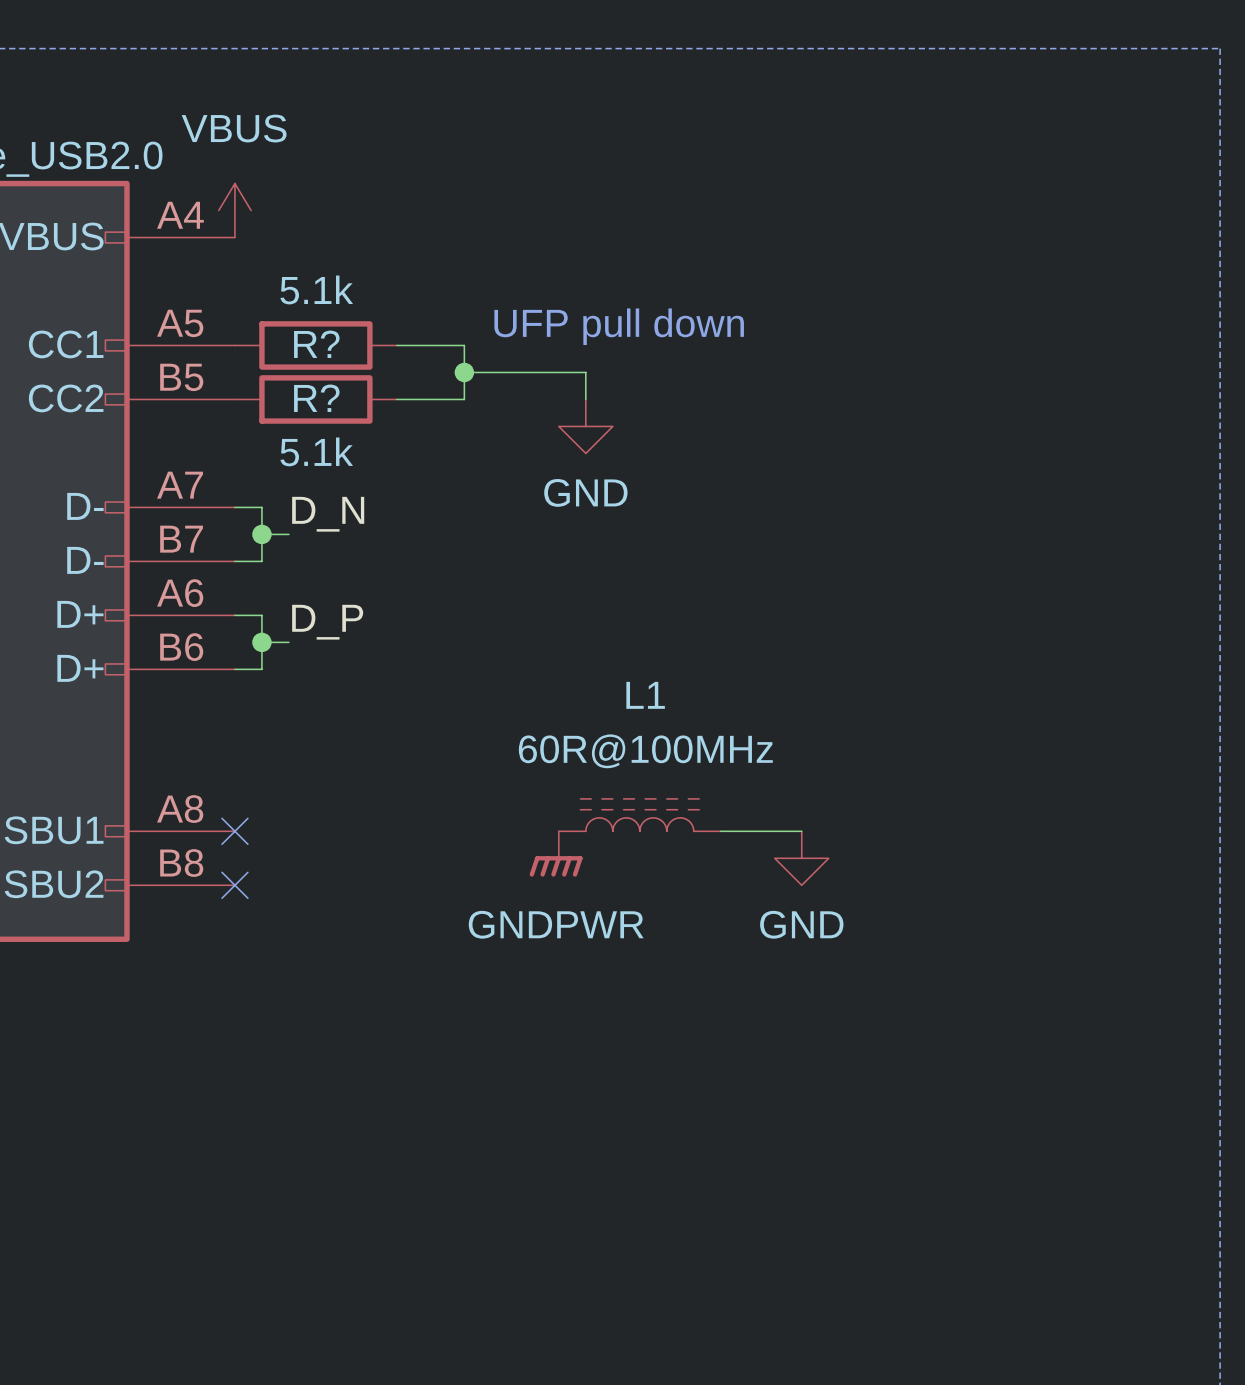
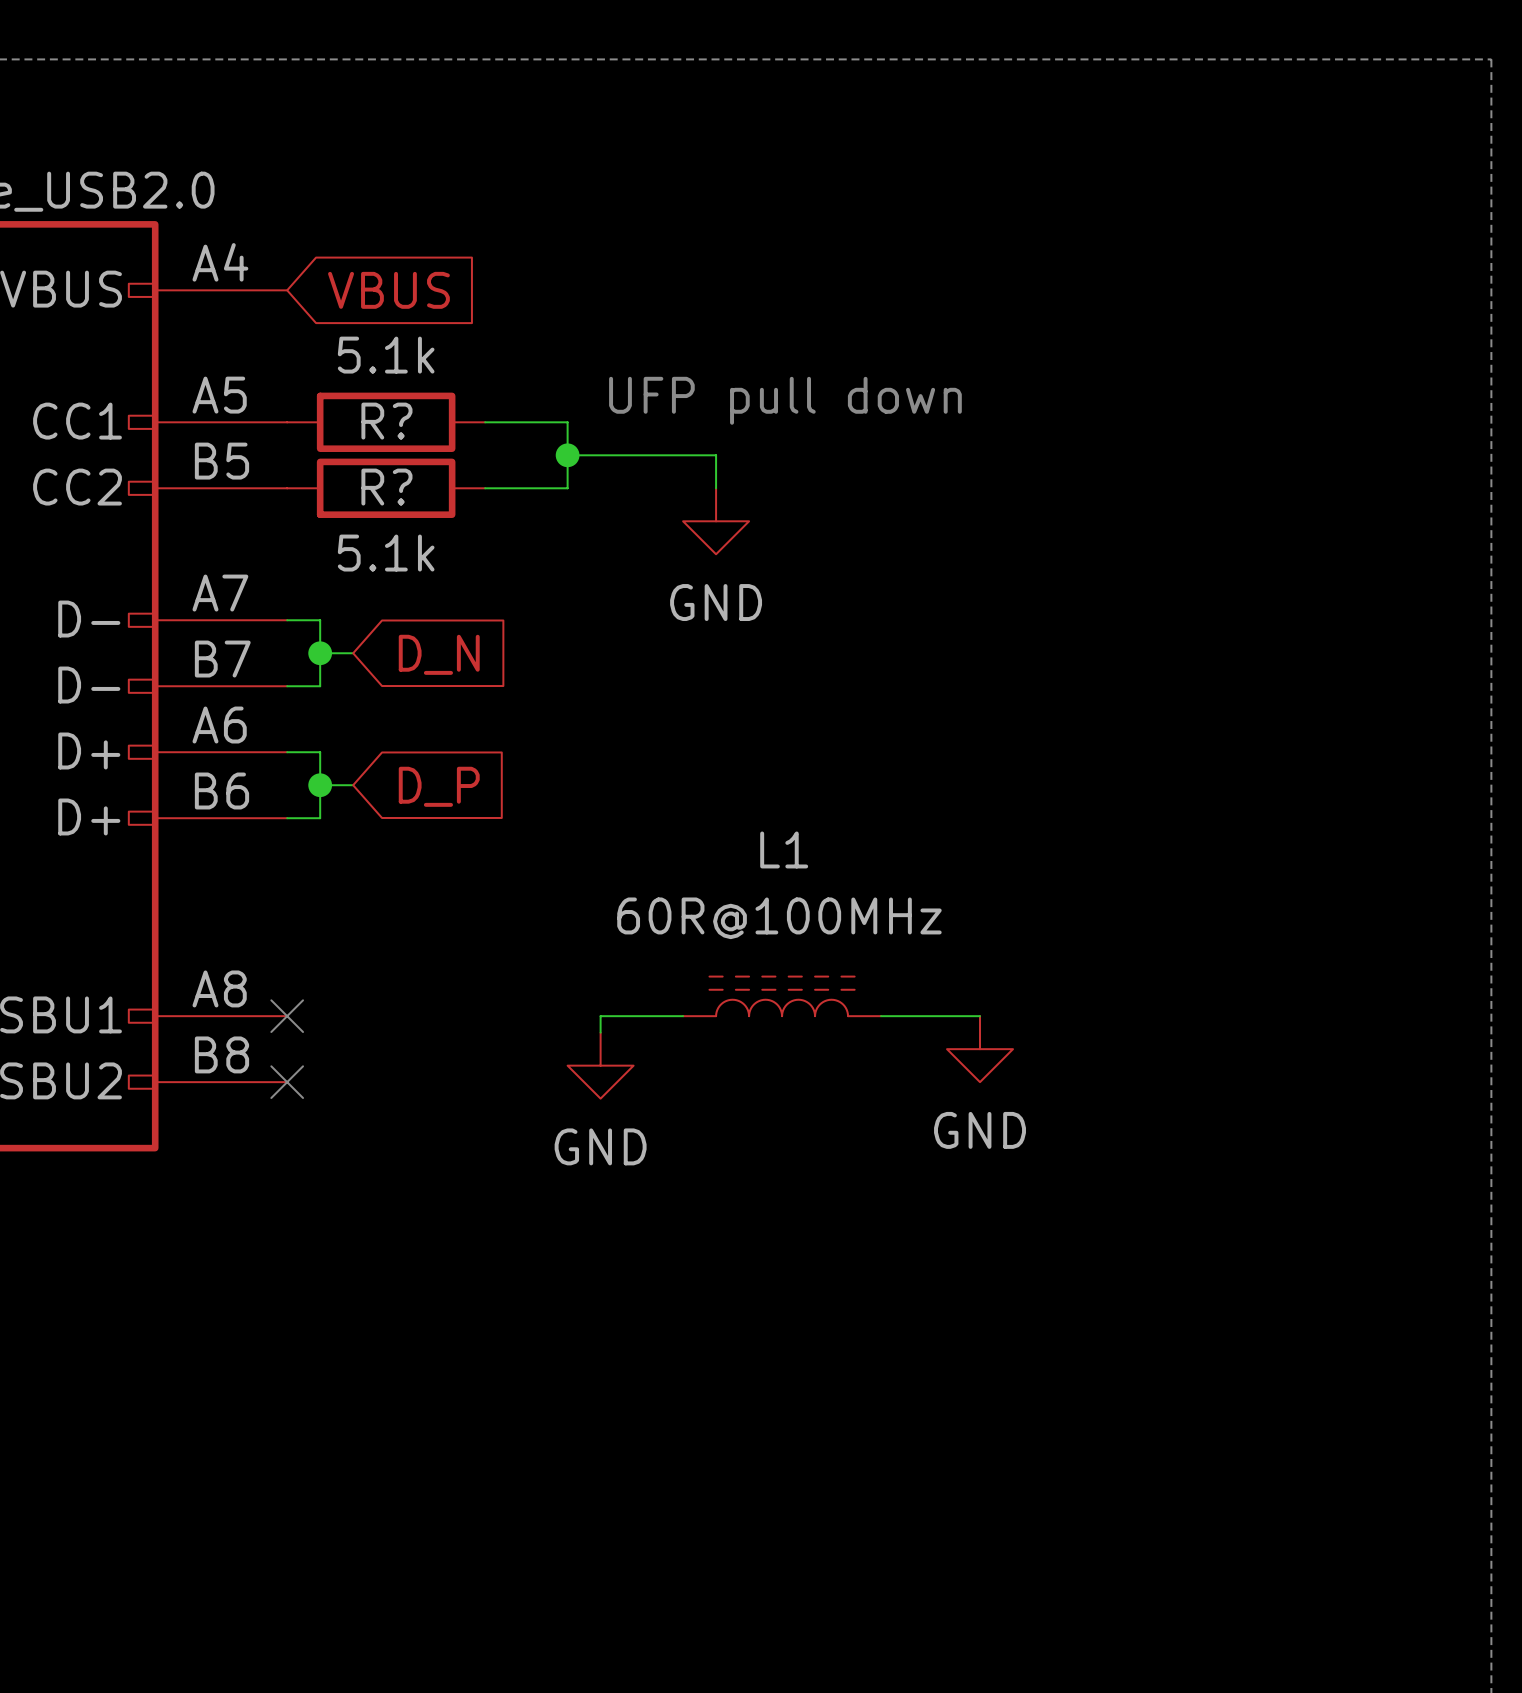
power symbol: VBUS (234, 210) -> none
global label: none -> VBUS (388, 290)
label: D_N (328, 514) -> none
global label: none -> D_N (439, 654)
label: D_P (327, 622) -> none
global label: none -> D_P (439, 786)
wire: none -> (683, 1016) (600, 1016) (600, 1032)
power symbol: GNDPWR (556, 853) -> none
power symbol: none -> GND (600, 1065)

